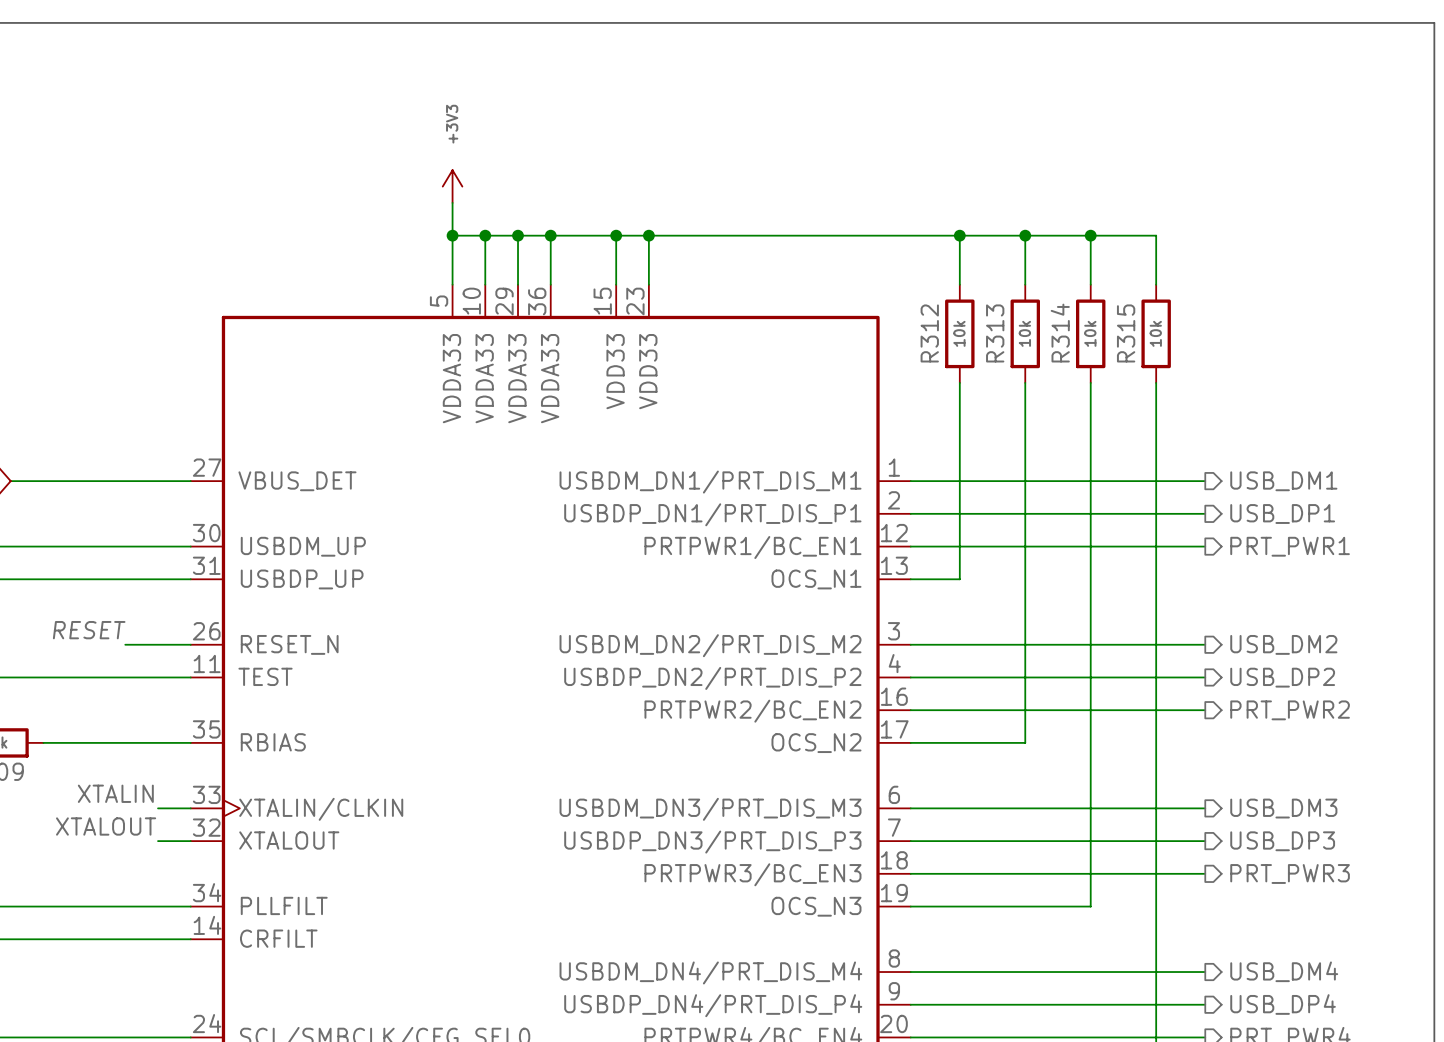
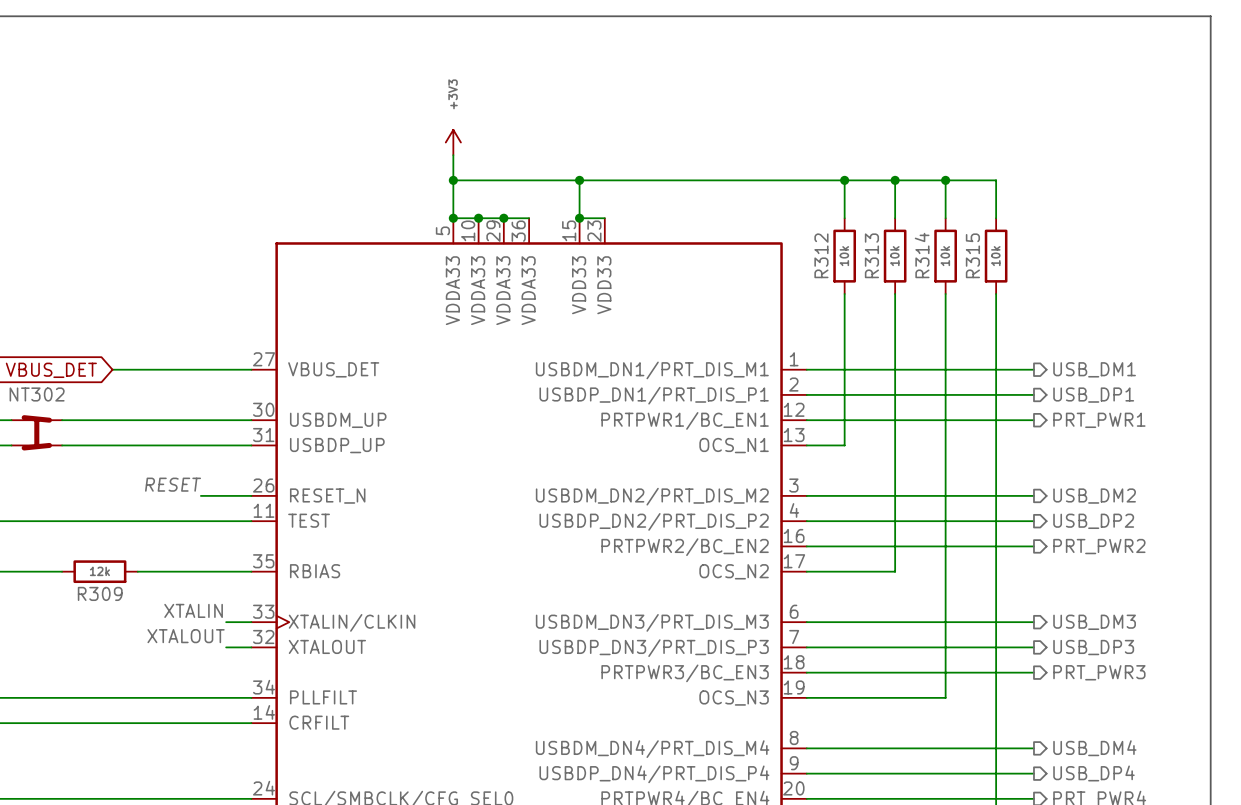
wire: (485, 235) (485, 284) -> none
junction: (485, 235) -> none
wire: (518, 235) (518, 284) -> none
junction: (518, 235) -> none
wire: (550, 235) (550, 284) -> (453, 218) (529, 218)
junction: (550, 235) -> none
wire: (648, 235) (648, 284) -> (579, 218) (604, 218)
junction: (648, 235) -> none
junction: none -> (453, 218)
junction: none -> (478, 218)
junction: none -> (503, 218)
junction: none -> (579, 218)

